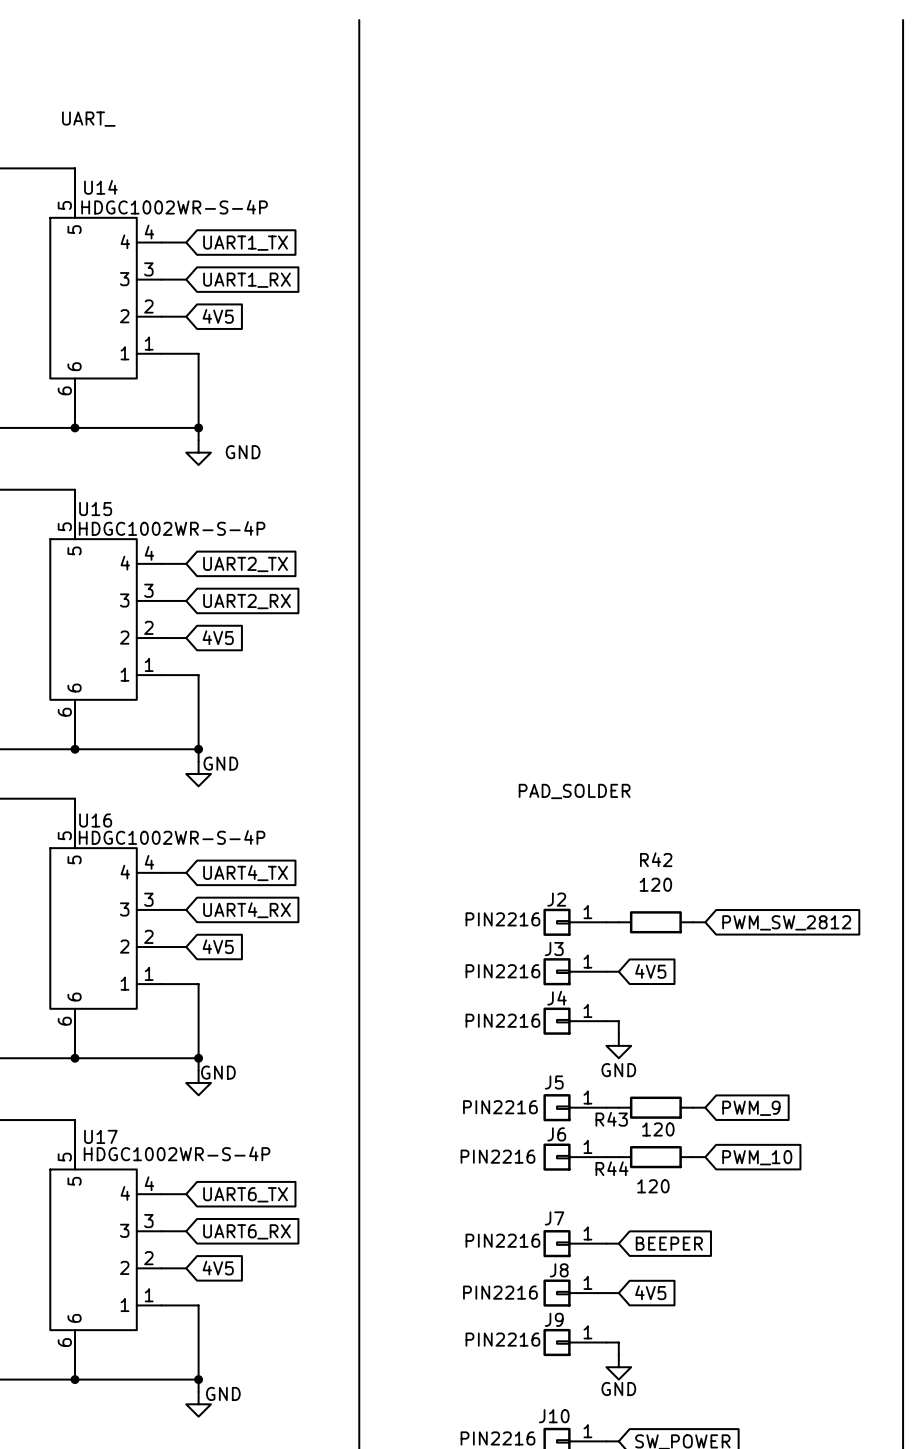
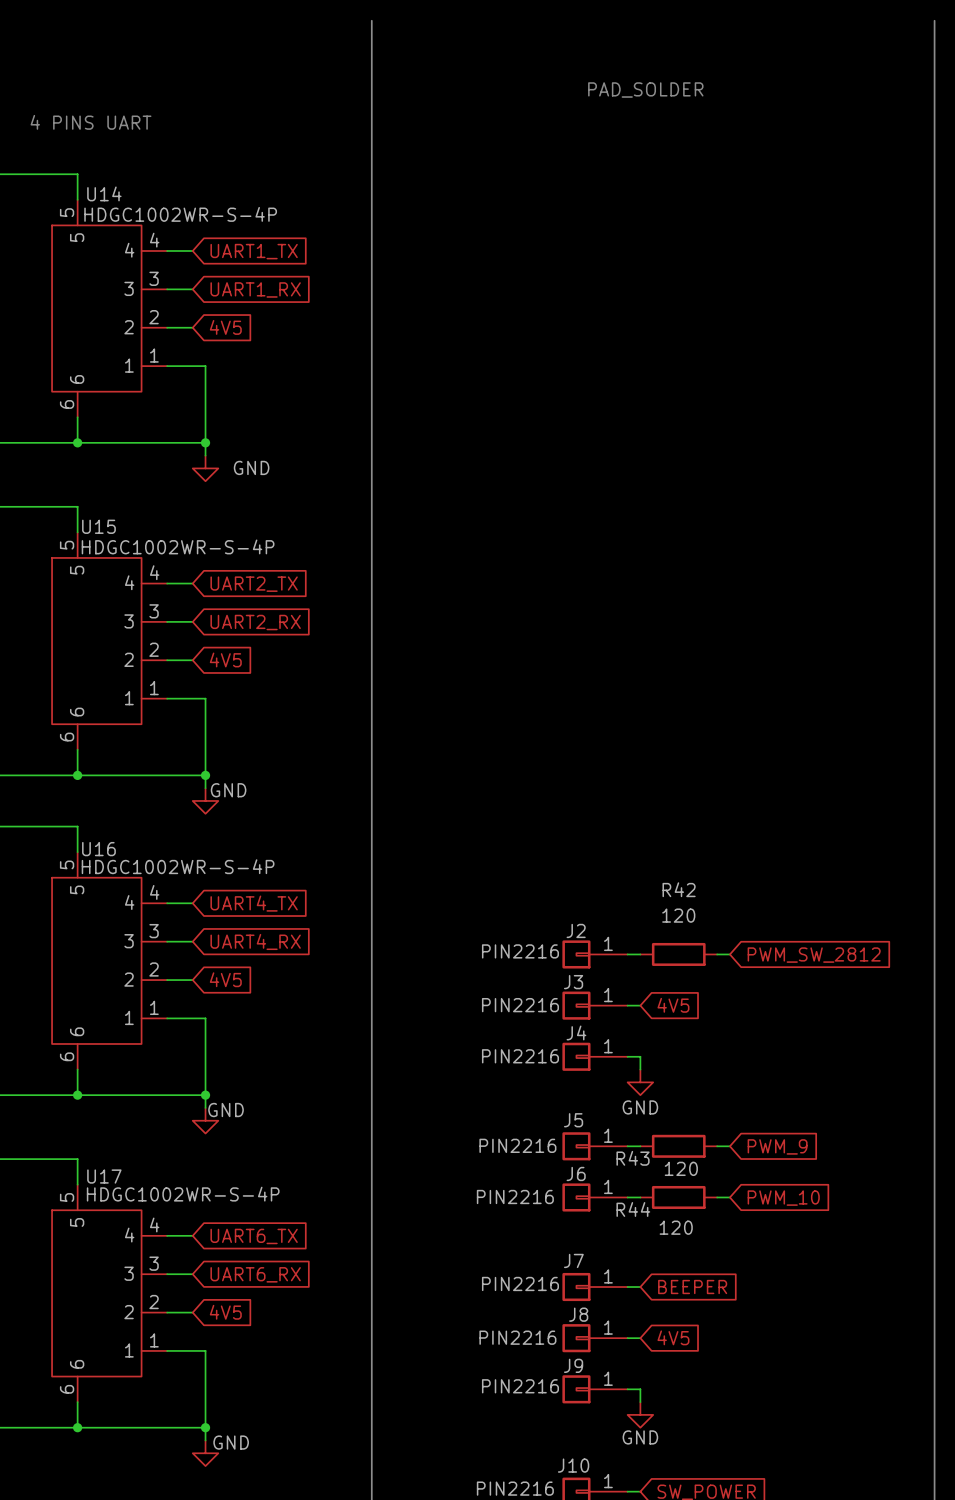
text: none -> PAD_SOLDER (645, 90)
text: UART_ (88, 119) -> 4 PINS UART (91, 122)
text: PAD_SOLDER (574, 791) -> none

